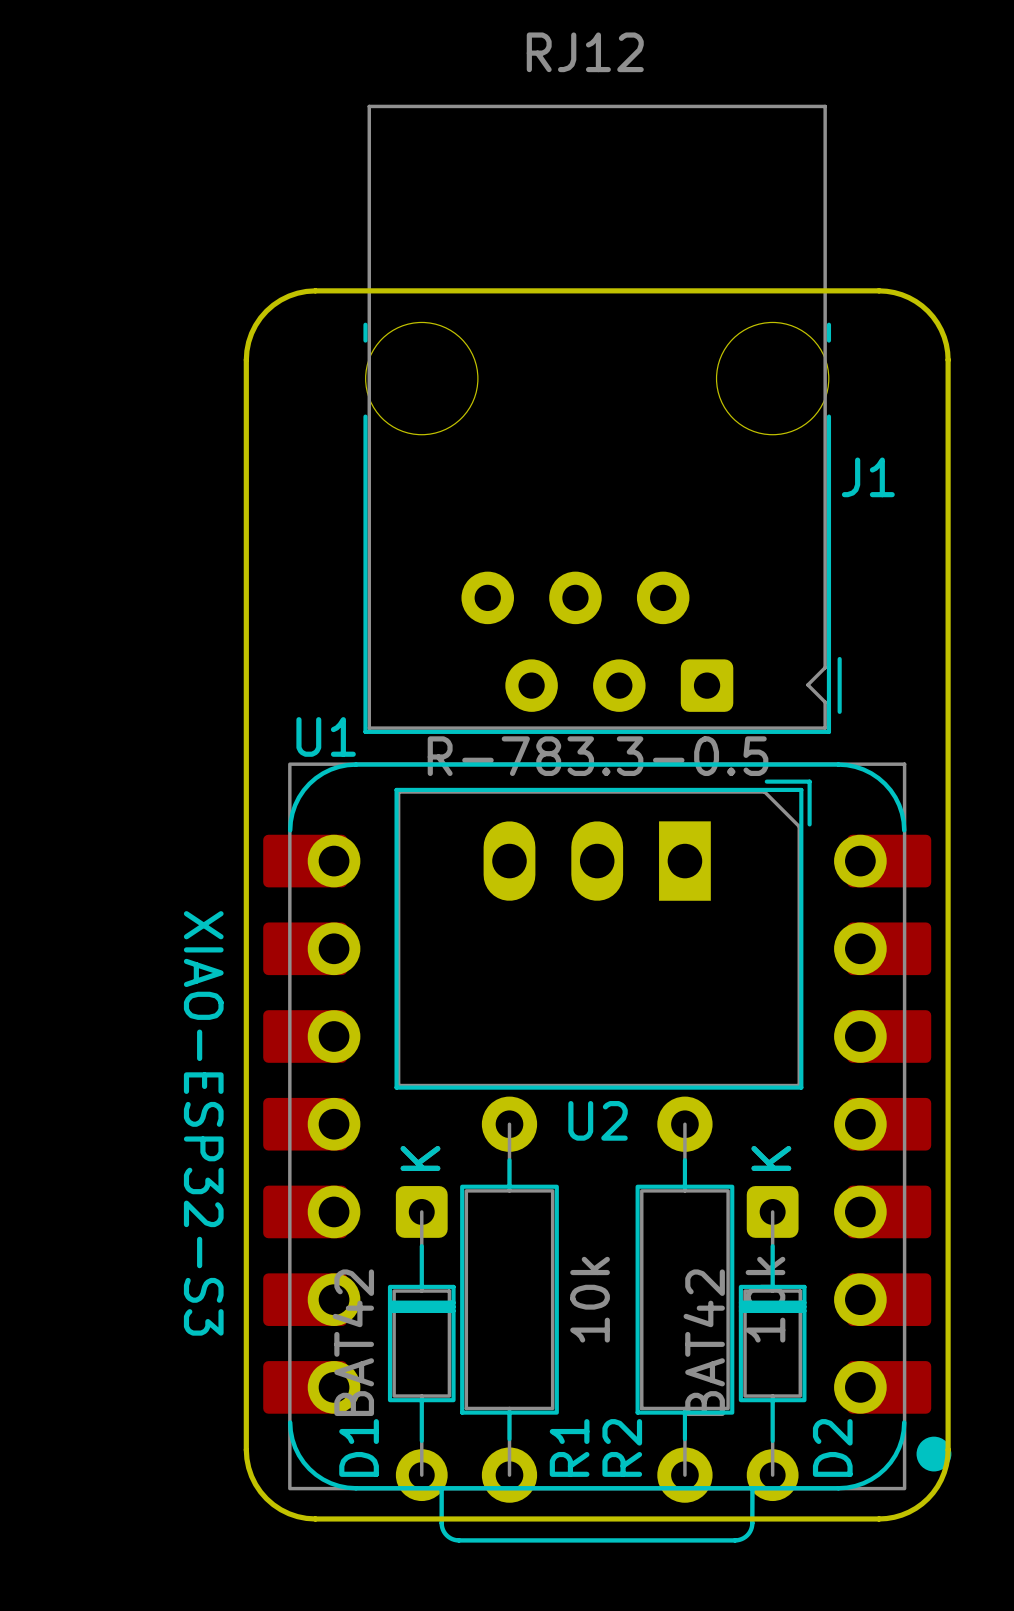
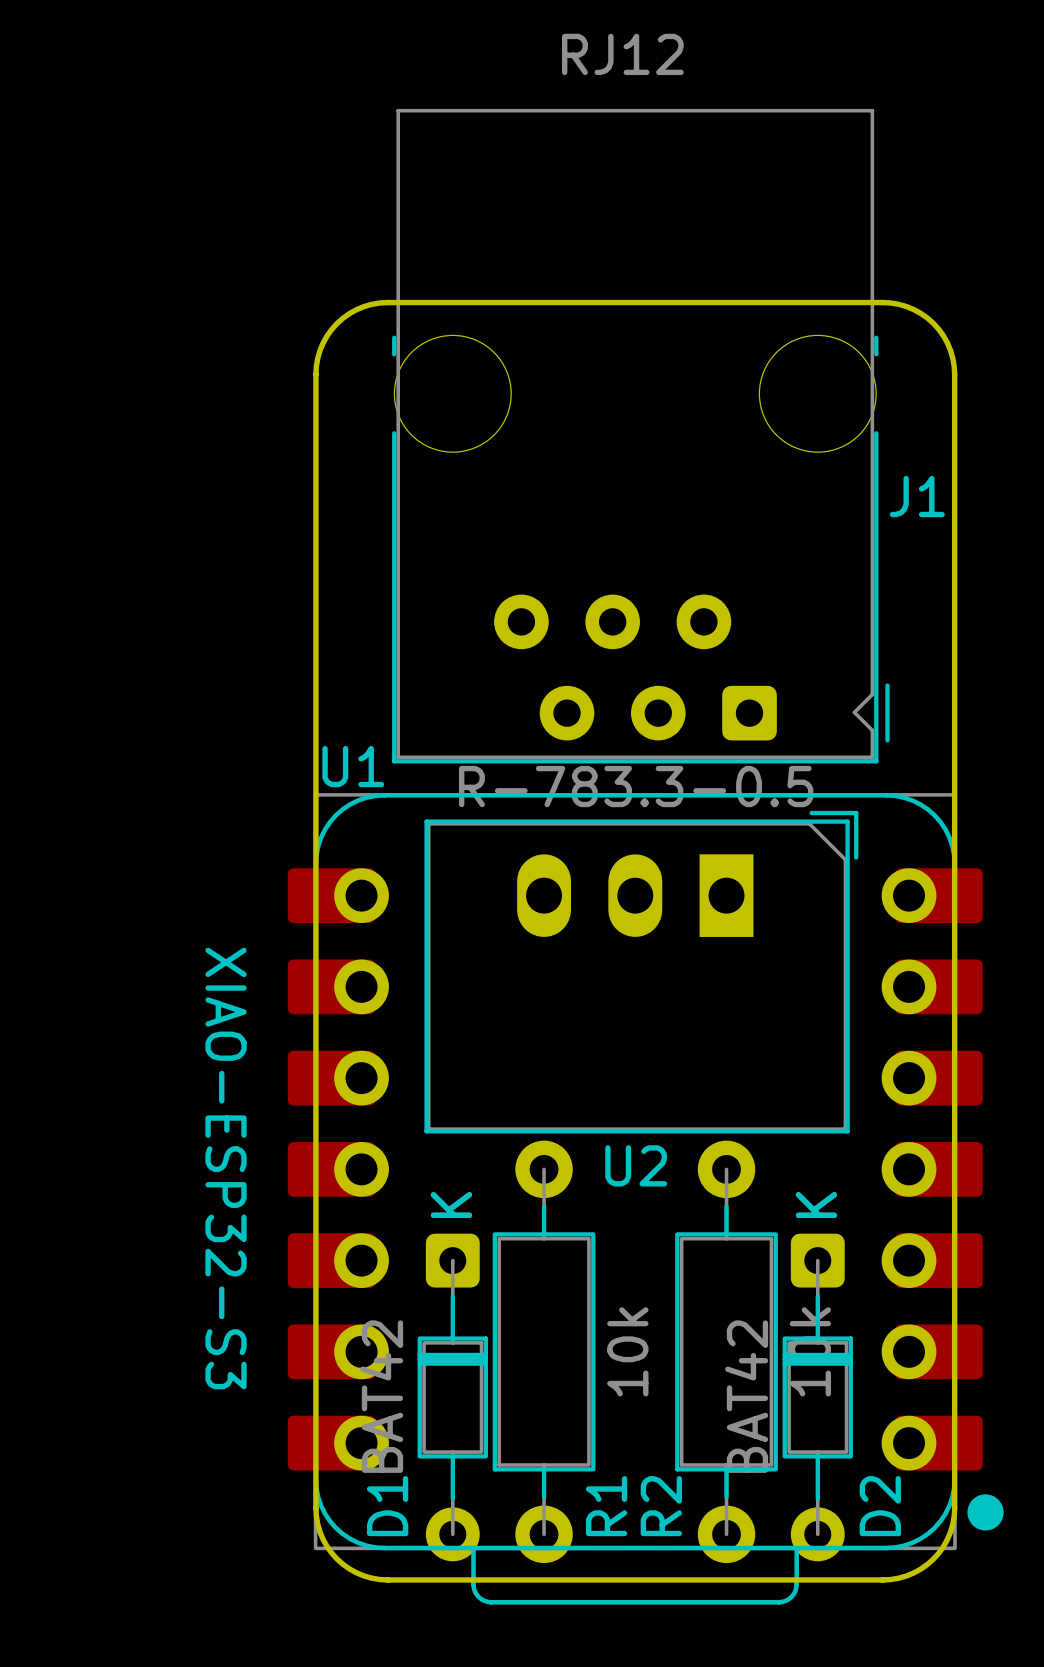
board edge: (359, 290) (306, 291) (280, 300) (266, 311) (255, 325) (248, 342) (246, 359) (246, 1458) (251, 1476) (260, 1491) (280, 1509) (306, 1518) (359, 1518) -> (387, 302) (371, 304) (356, 309) (336, 323) (323, 343) (317, 358) (315, 374) (316, 1516) (323, 1539) (336, 1558) (349, 1568) (364, 1575) (387, 1579)
board edge: (835, 290) (886, 291) (901, 294) (915, 301) (927, 311) (937, 323) (944, 337) (948, 359) (947, 1457) (944, 1472) (937, 1486) (922, 1503) (909, 1512) (886, 1518) (835, 1518) -> (882, 302) (898, 304) (913, 309) (933, 323) (947, 343) (952, 358) (954, 374) (954, 1516) (947, 1539) (938, 1552) (927, 1564) (906, 1575) (882, 1579)

